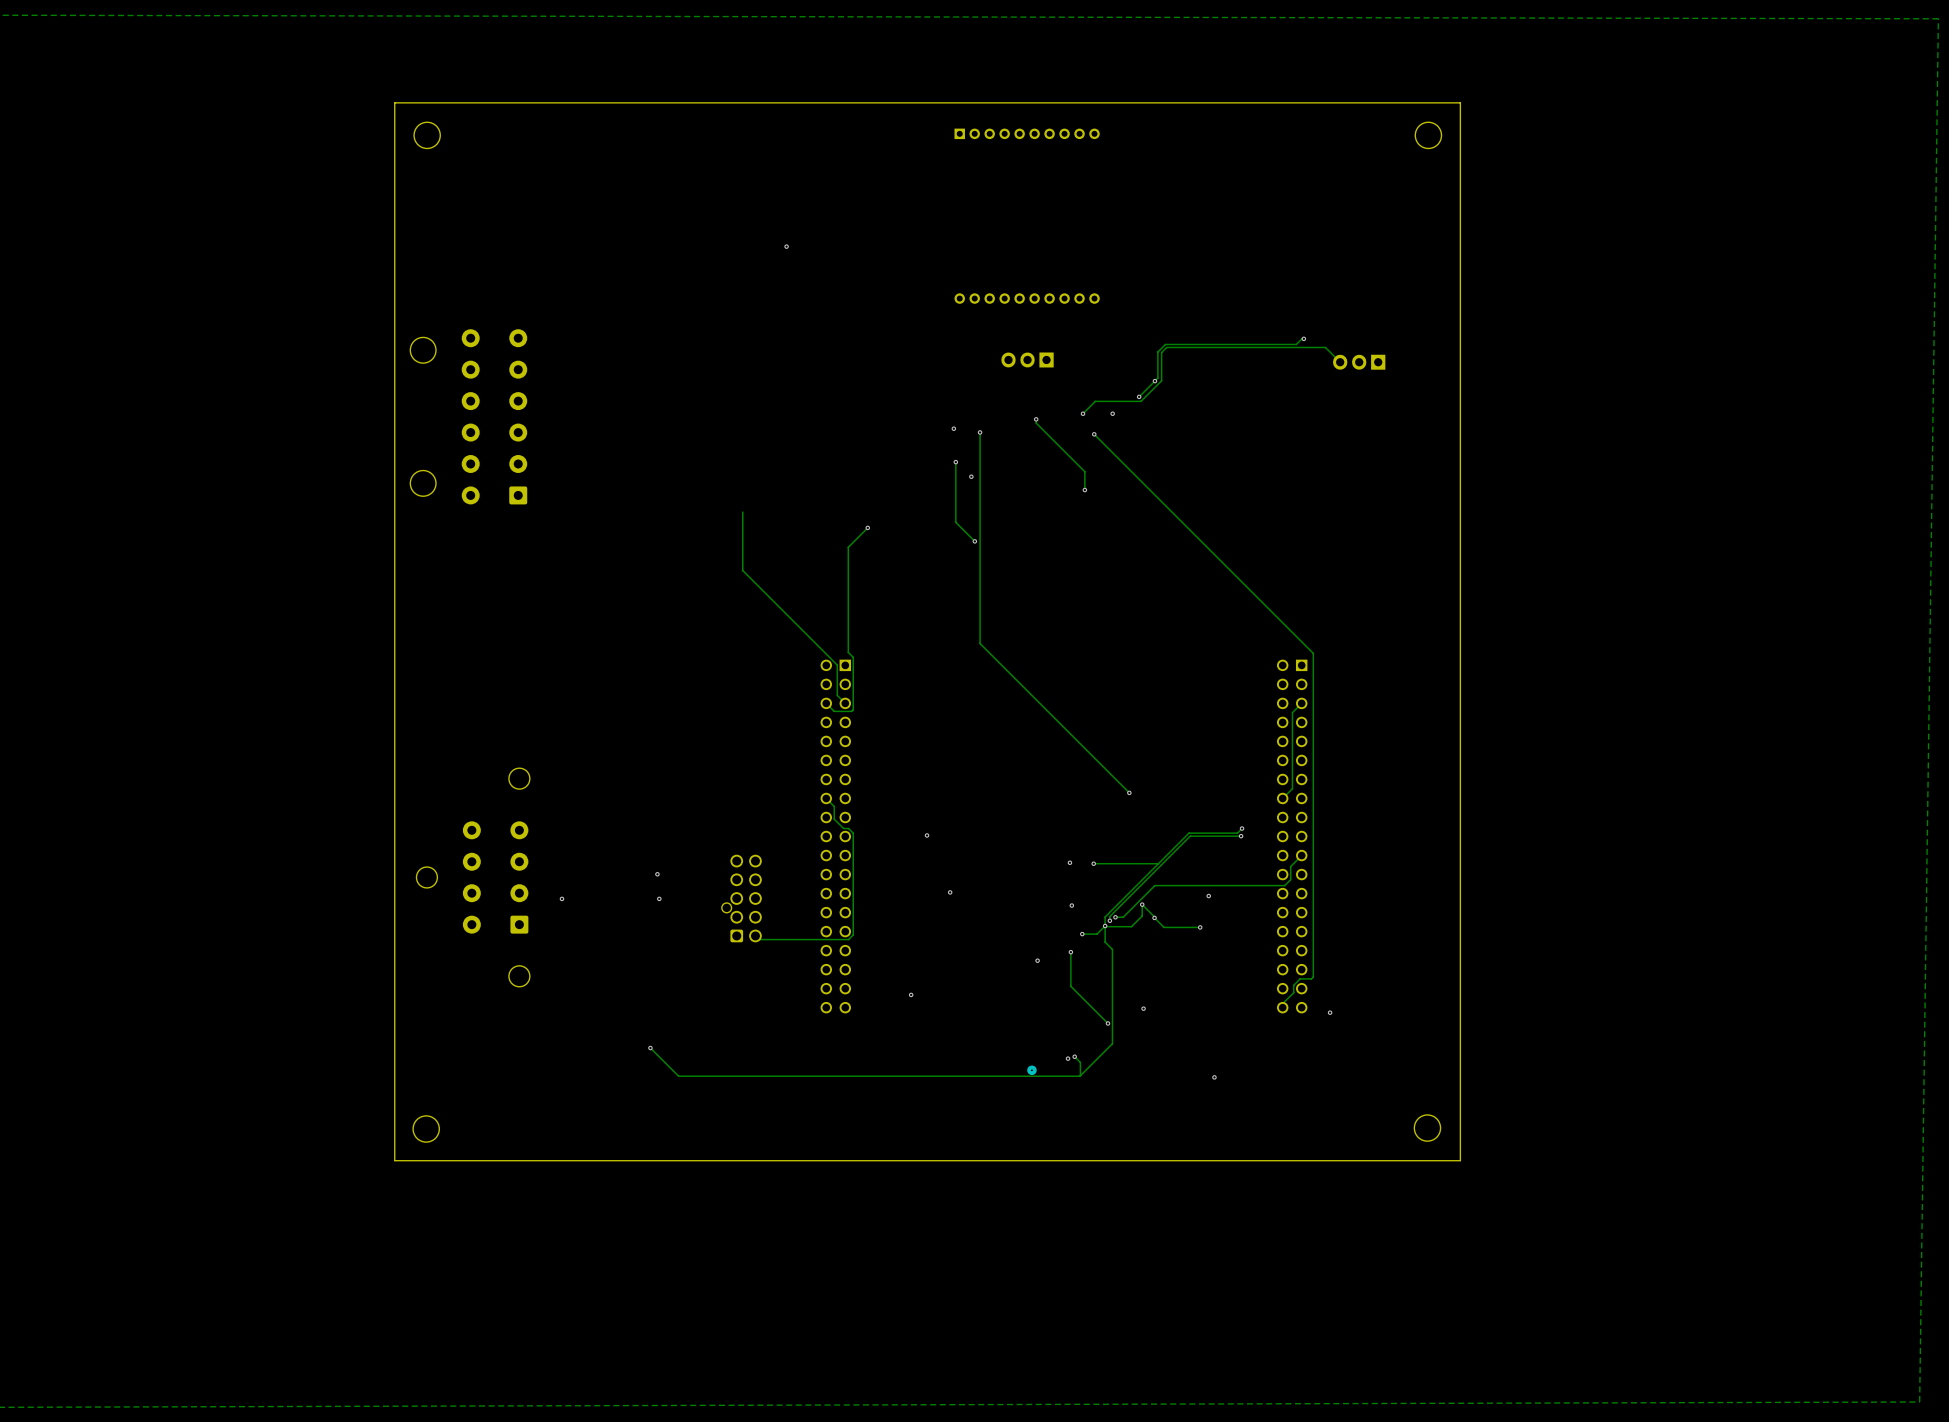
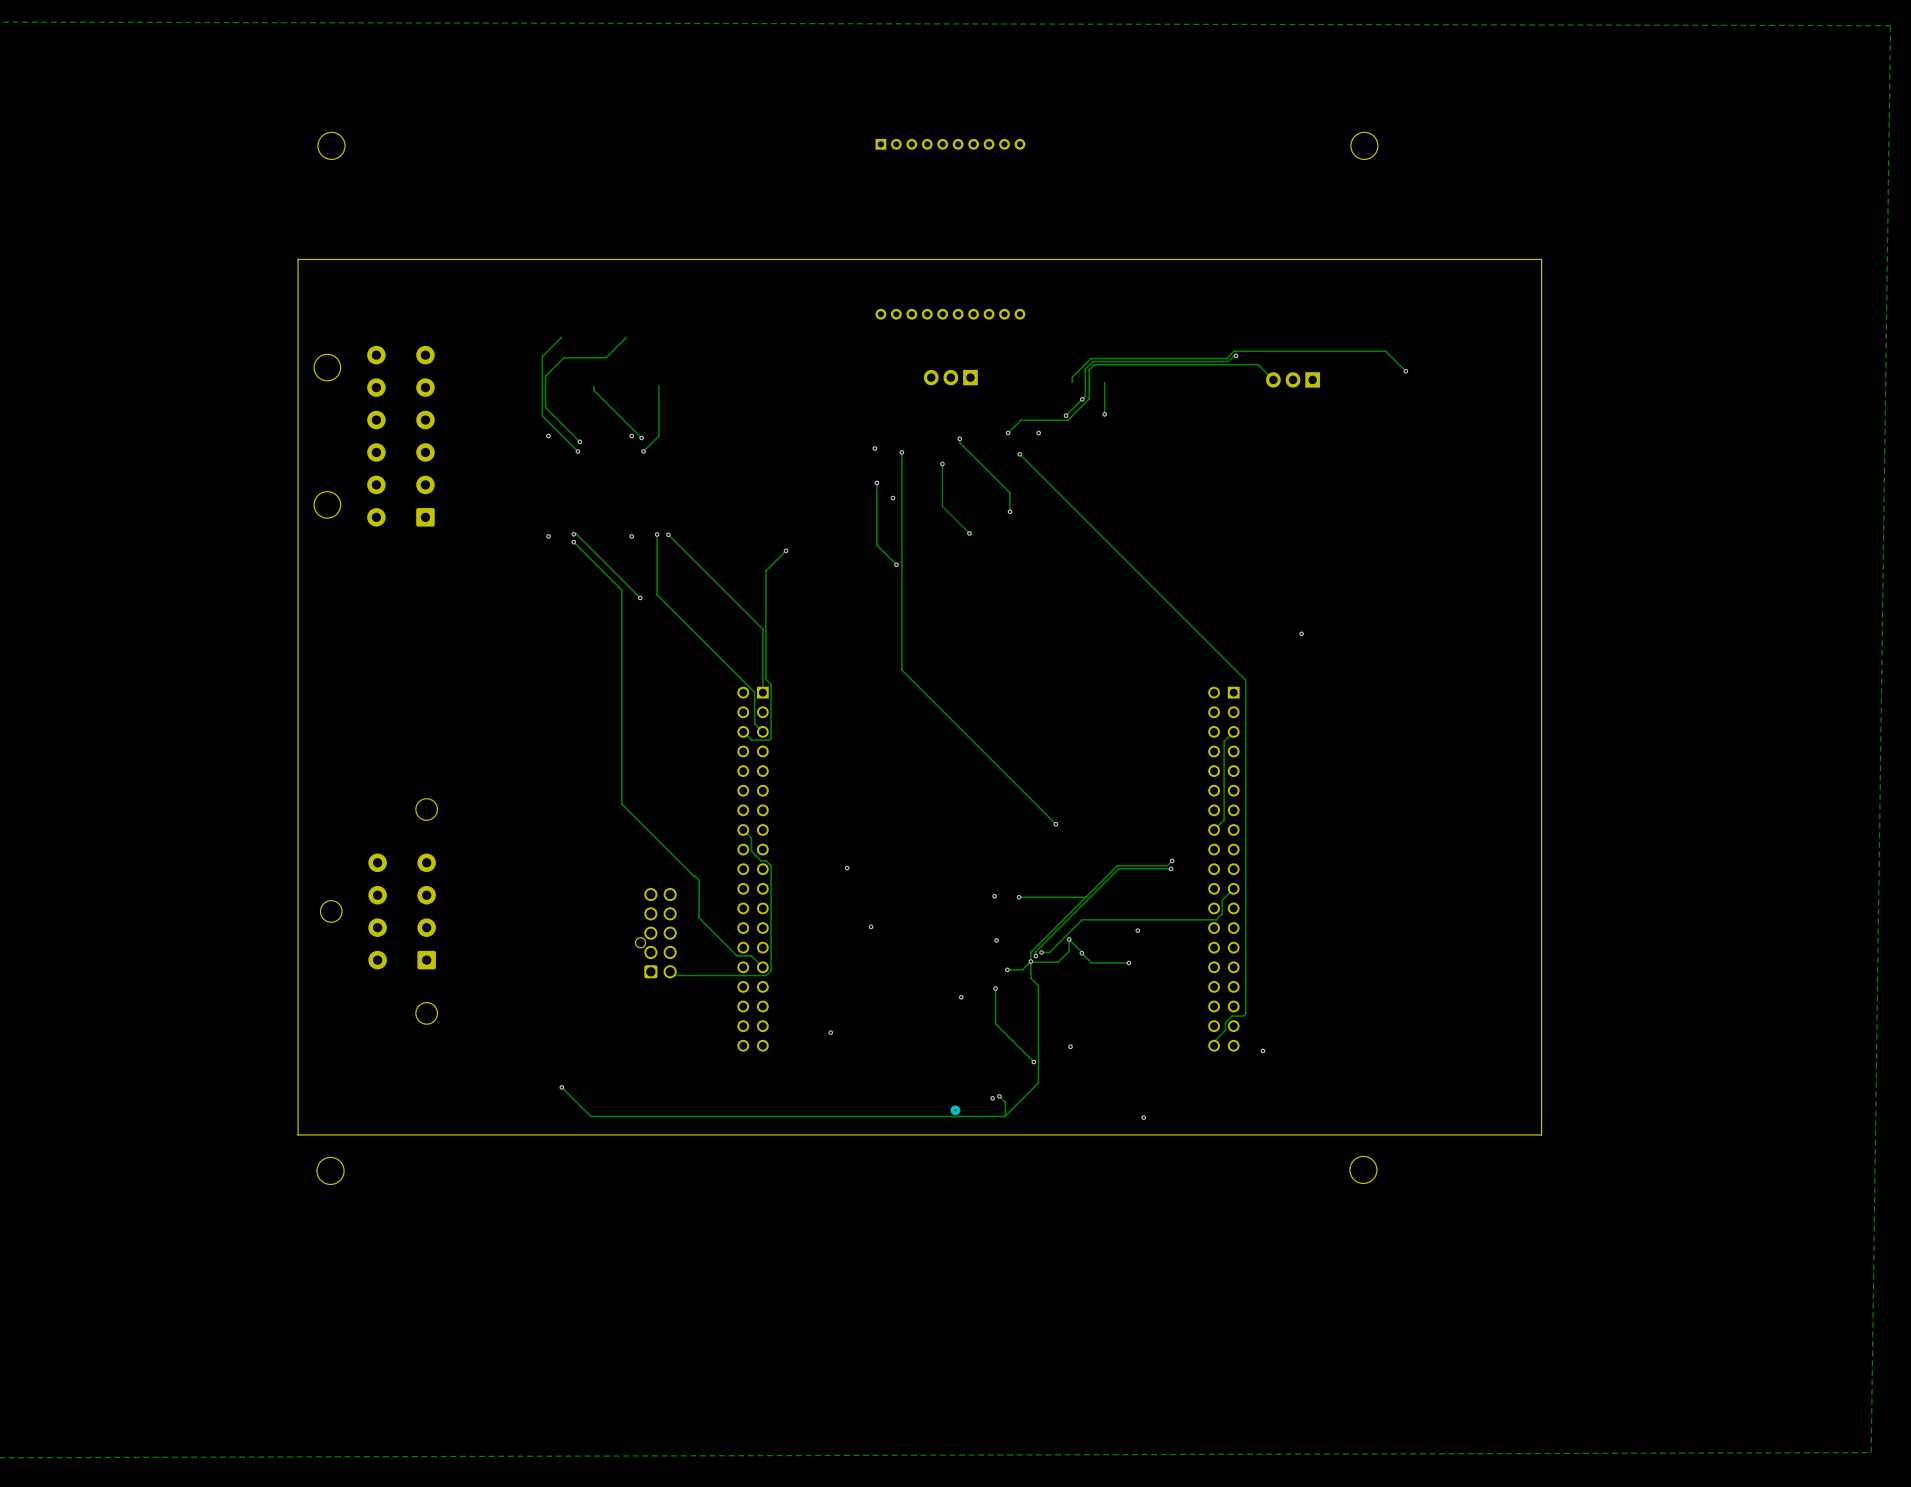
board edge: (394, 245) (394, 102) (1460, 102) (1460, 1160) (394, 1160) (394, 1094) -> (298, 259) (1541, 259) (1541, 1134) (298, 1134)
via: (786, 246) -> none
track: none -> (561, 337) (542, 356) (542, 415) (577, 451)
track: none -> (626, 337) (606, 357) (563, 357) (545, 376) (545, 407) (579, 441)
track: none -> (1405, 371) (1385, 351) (1234, 351) (1226, 358) (1091, 358) (1072, 377) (1072, 382)
via: none -> (1405, 371)
track: none -> (1104, 382) (1104, 414)
track: none -> (594, 386) (594, 390) (641, 437)
track: none -> (658, 386) (658, 436) (643, 451)
via: none -> (1104, 414)
via: none -> (548, 436)
via: none -> (631, 436)
via: none -> (641, 437)
via: none -> (579, 441)
via: none -> (577, 451)
via: none -> (643, 451)
track: none -> (942, 463) (942, 506) (969, 533)
via: none -> (942, 463)
track: none -> (573, 534) (576, 534) (640, 597)
via: none -> (573, 534)
via: none -> (969, 533)
via: none -> (657, 534)
track: none -> (668, 534) (762, 629) (762, 692)
via: none -> (668, 534)
via: none -> (548, 536)
via: none -> (631, 536)
track: none -> (573, 542) (621, 590) (621, 804) (699, 880) (699, 917) (737, 955) (751, 955) (762, 967)
via: none -> (573, 542)
via: none -> (640, 597)
via: none -> (1301, 633)
via: (657, 874) -> none
via: (561, 898) -> none
via: (659, 898) -> none

